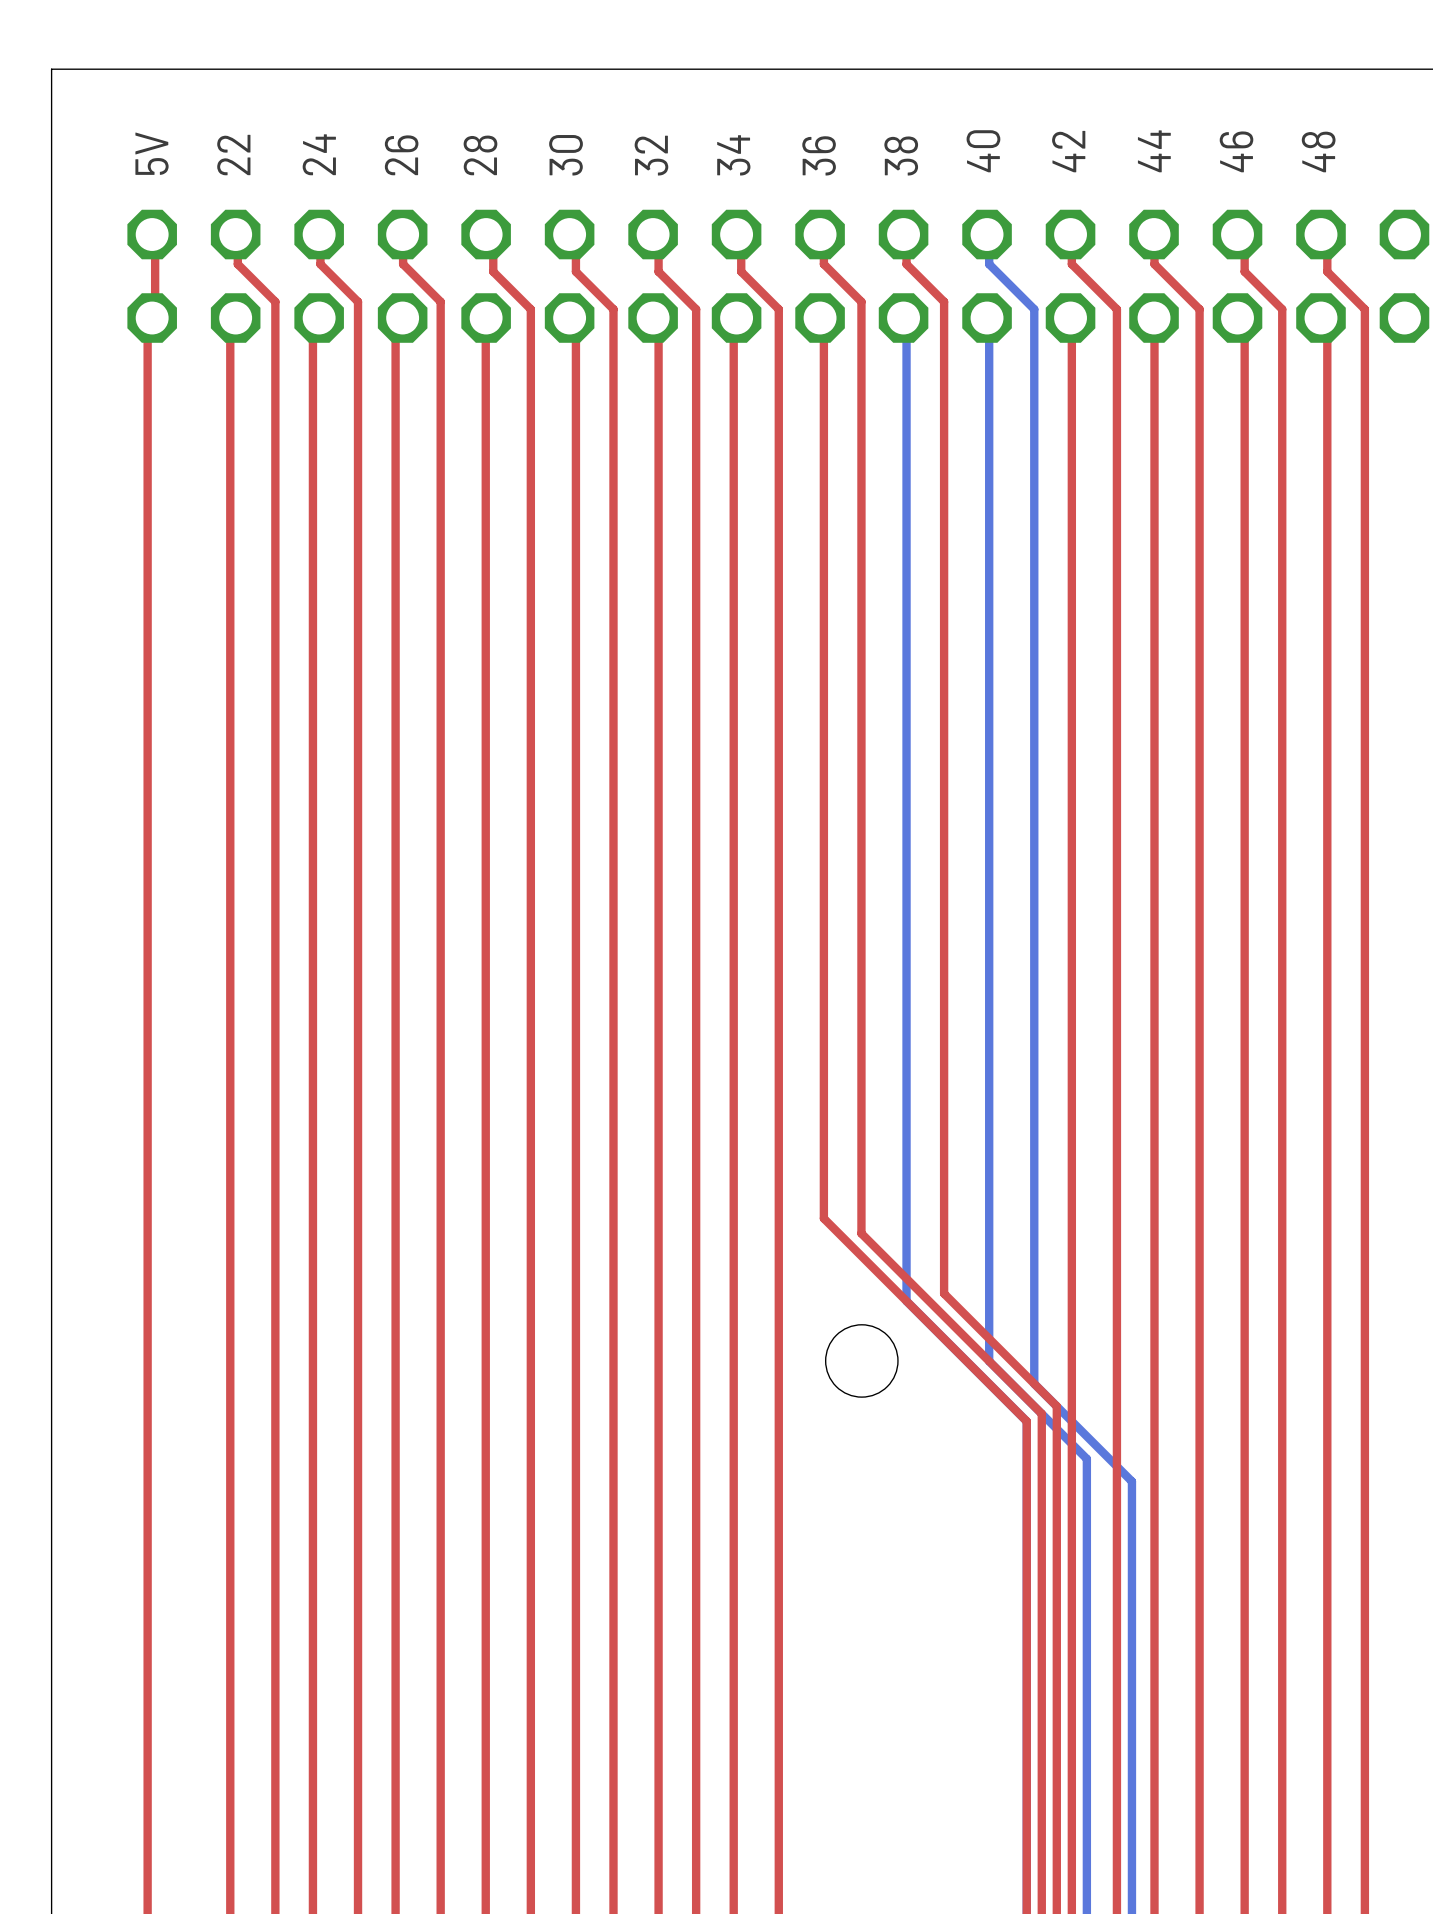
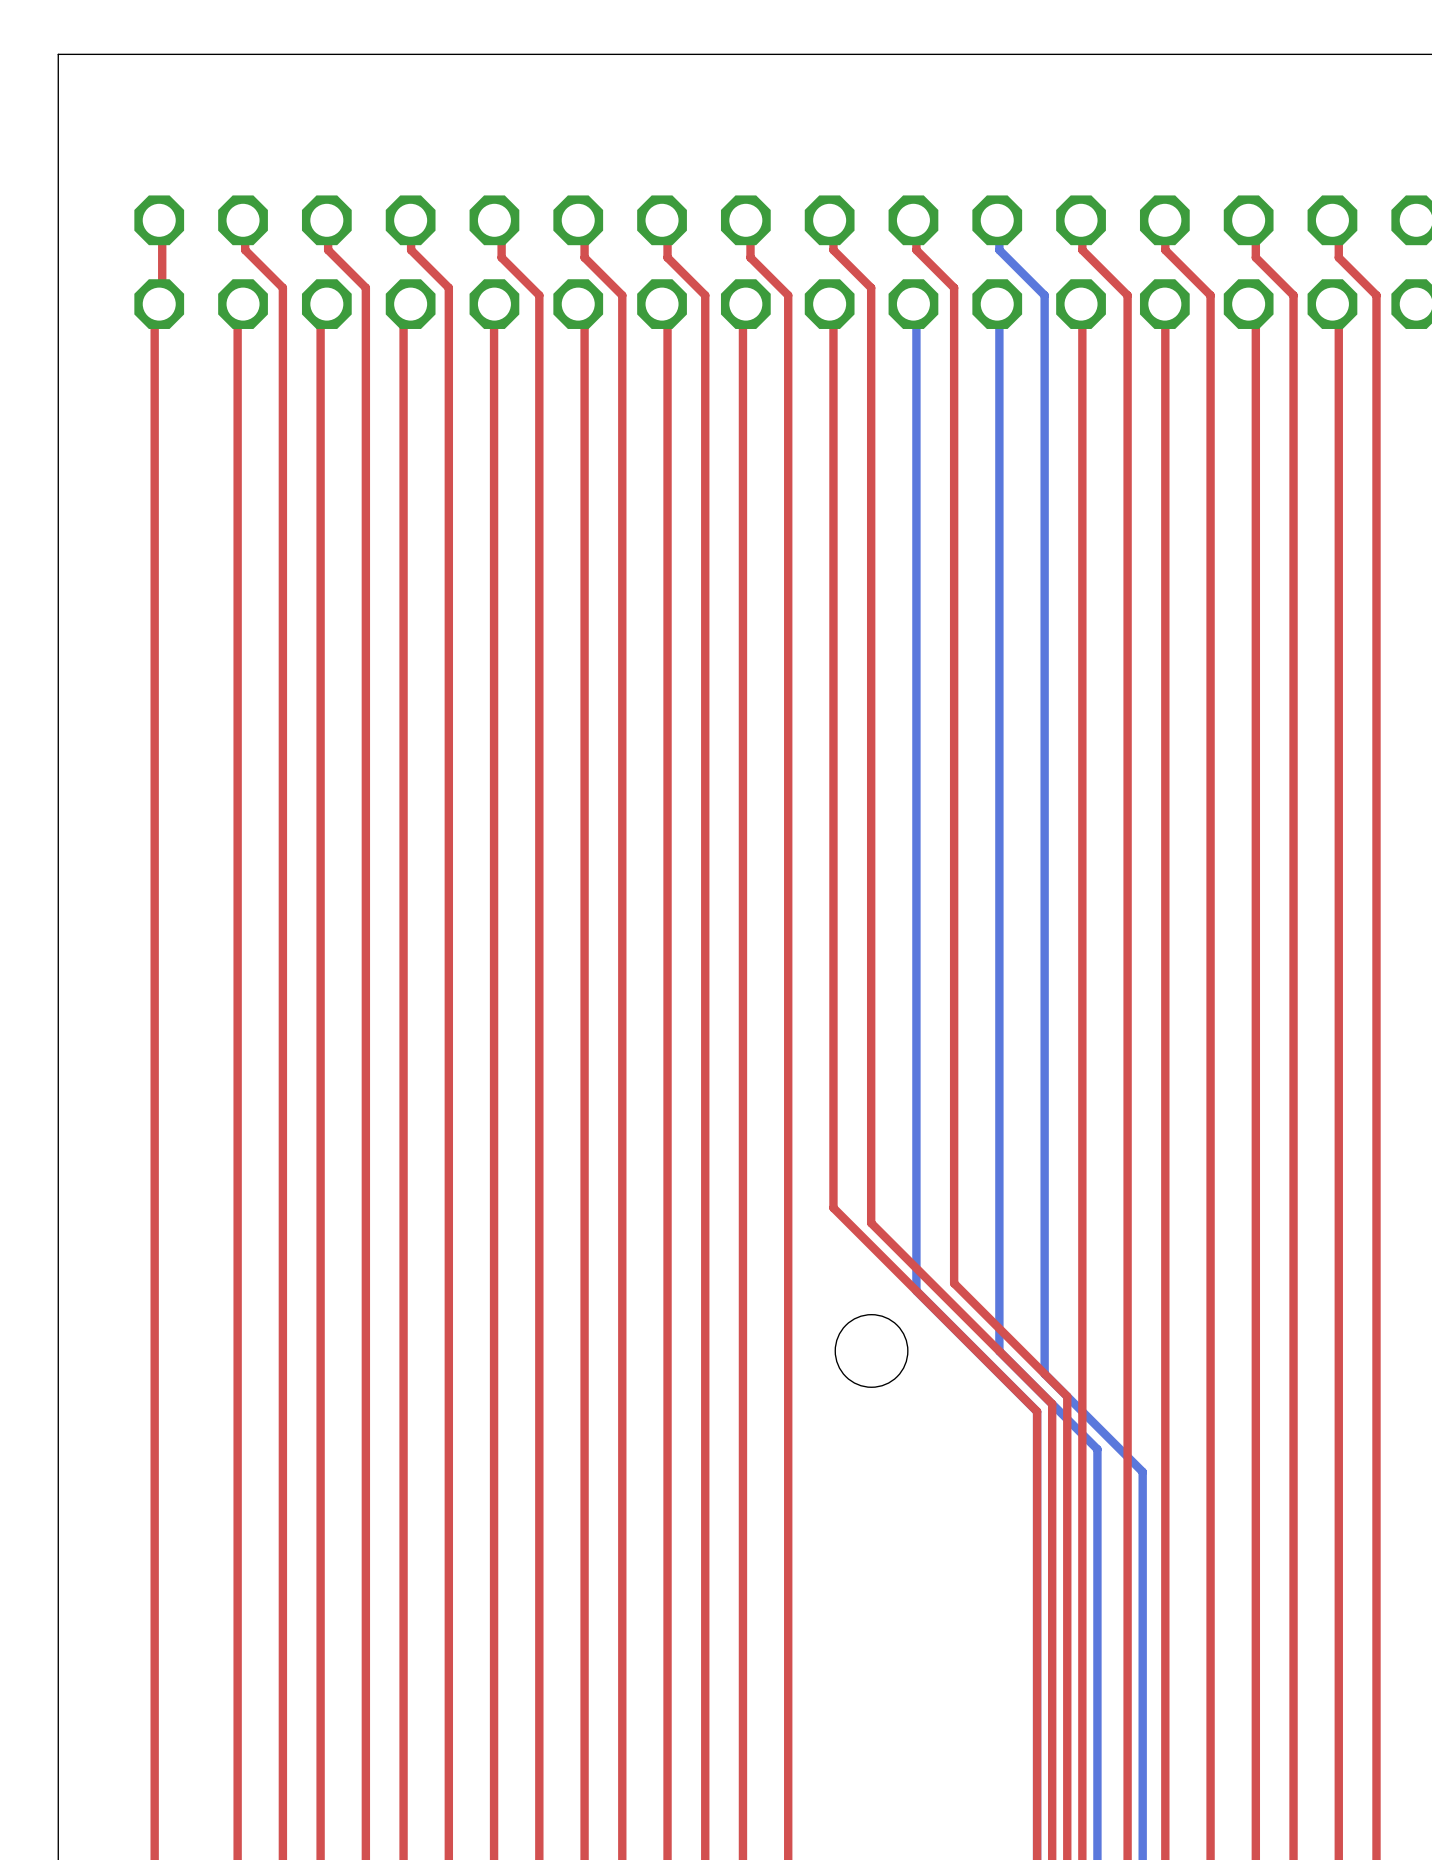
text: 40 (983, 151) -> none
text: 42 (1068, 151) -> none
text: 44 (1154, 151) -> none
text: 46 (1236, 151) -> none
text: 48 (1318, 151) -> none
text: 5V (152, 153) -> none
text: 24 (319, 154) -> none
text: 22 (233, 155) -> none
text: 26 (401, 155) -> none
text: 28 (480, 155) -> none
text: 30 (566, 155) -> none
text: 32 (651, 155) -> none
text: 34 (733, 155) -> none
text: 36 (819, 155) -> none
text: 38 (901, 156) -> none

